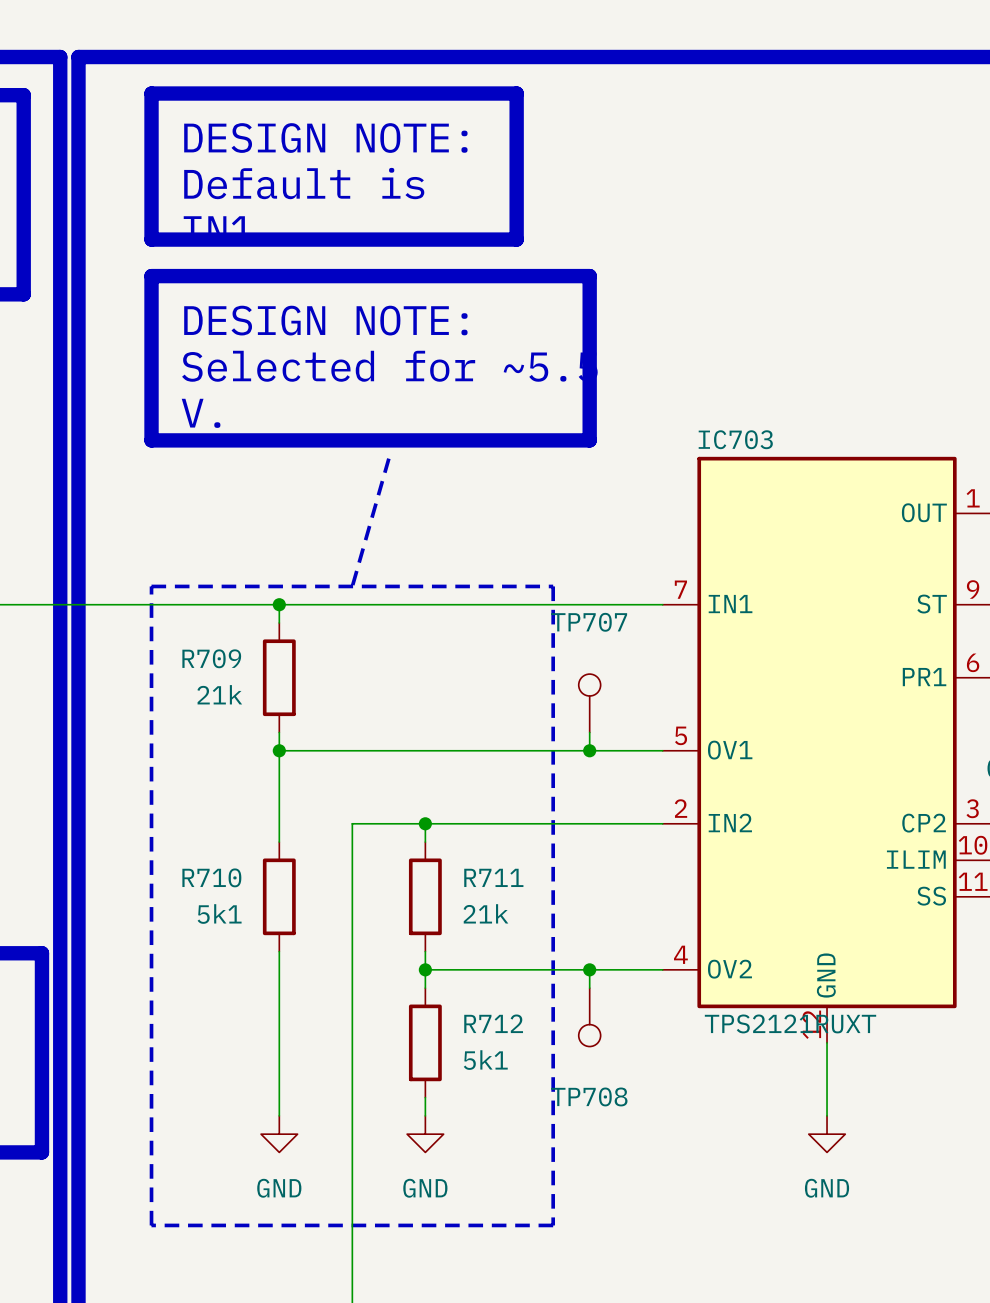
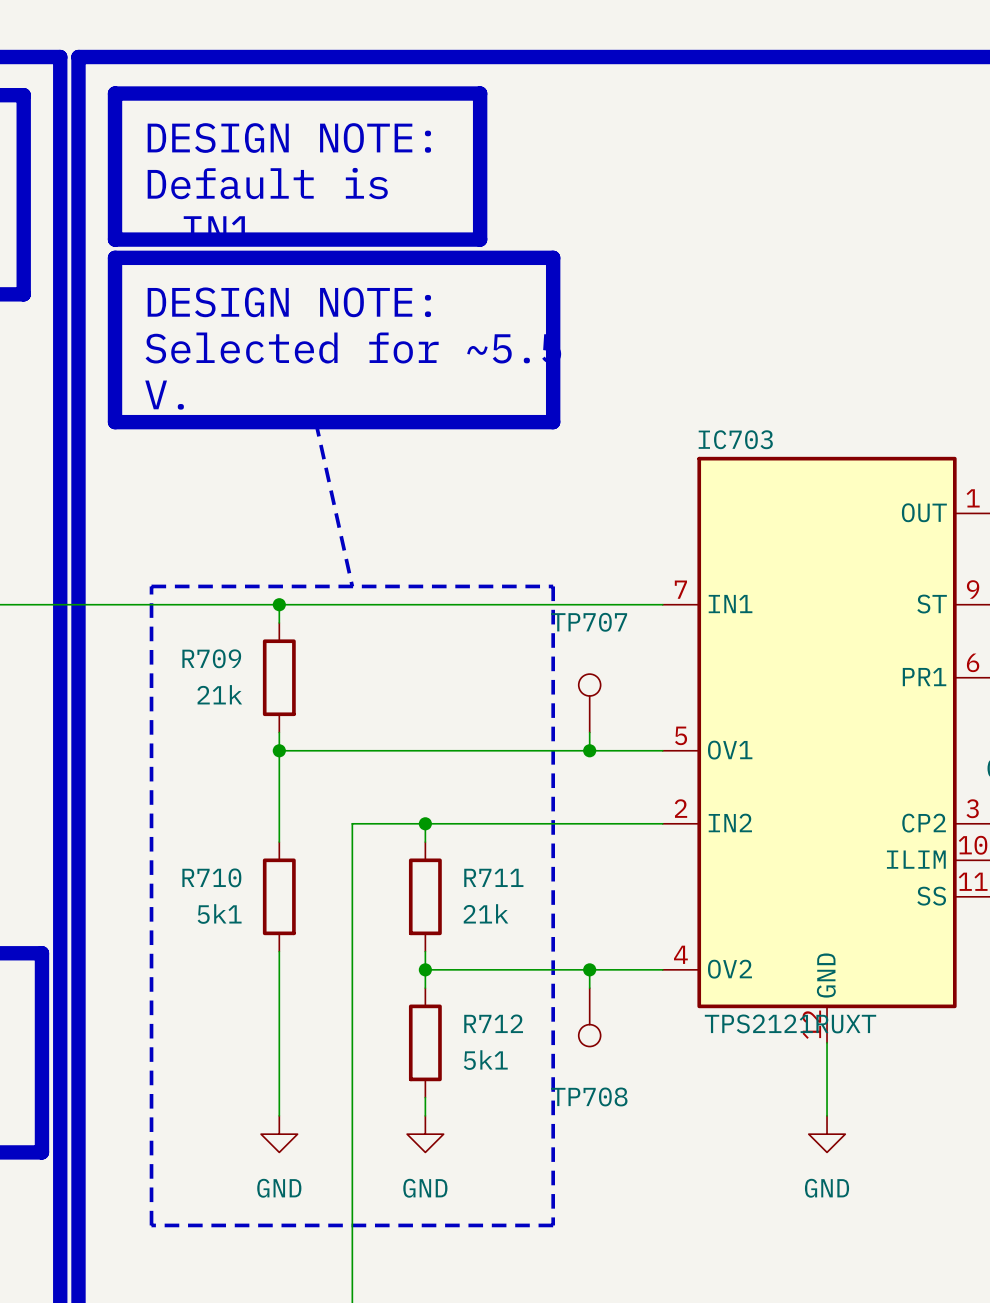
line: (151, 93) (151, 239) -> (151, 93) (115, 93) (115, 239) (151, 239)
line: (480, 93) (516, 93) (516, 239) (480, 239) -> (480, 93) (480, 239)
text position: DESIGN NOTE: (325, 138) -> DESIGN NOTE: (289, 138)
text position: Default is (304, 183) -> Default is (267, 183)
line: (151, 276) (589, 276) (589, 440) (151, 440) (151, 276) -> (115, 257) (553, 257) (553, 422) (115, 422) (115, 257)
text position: DESIGN NOTE: (325, 320) -> DESIGN NOTE: (289, 302)
text position: Selected for ~5.5 (389, 366) -> Selected for ~5.5 (353, 348)
text position: V. (201, 413) -> V. (164, 395)
line: (388, 458) (352, 586) -> (315, 422) (352, 586)

